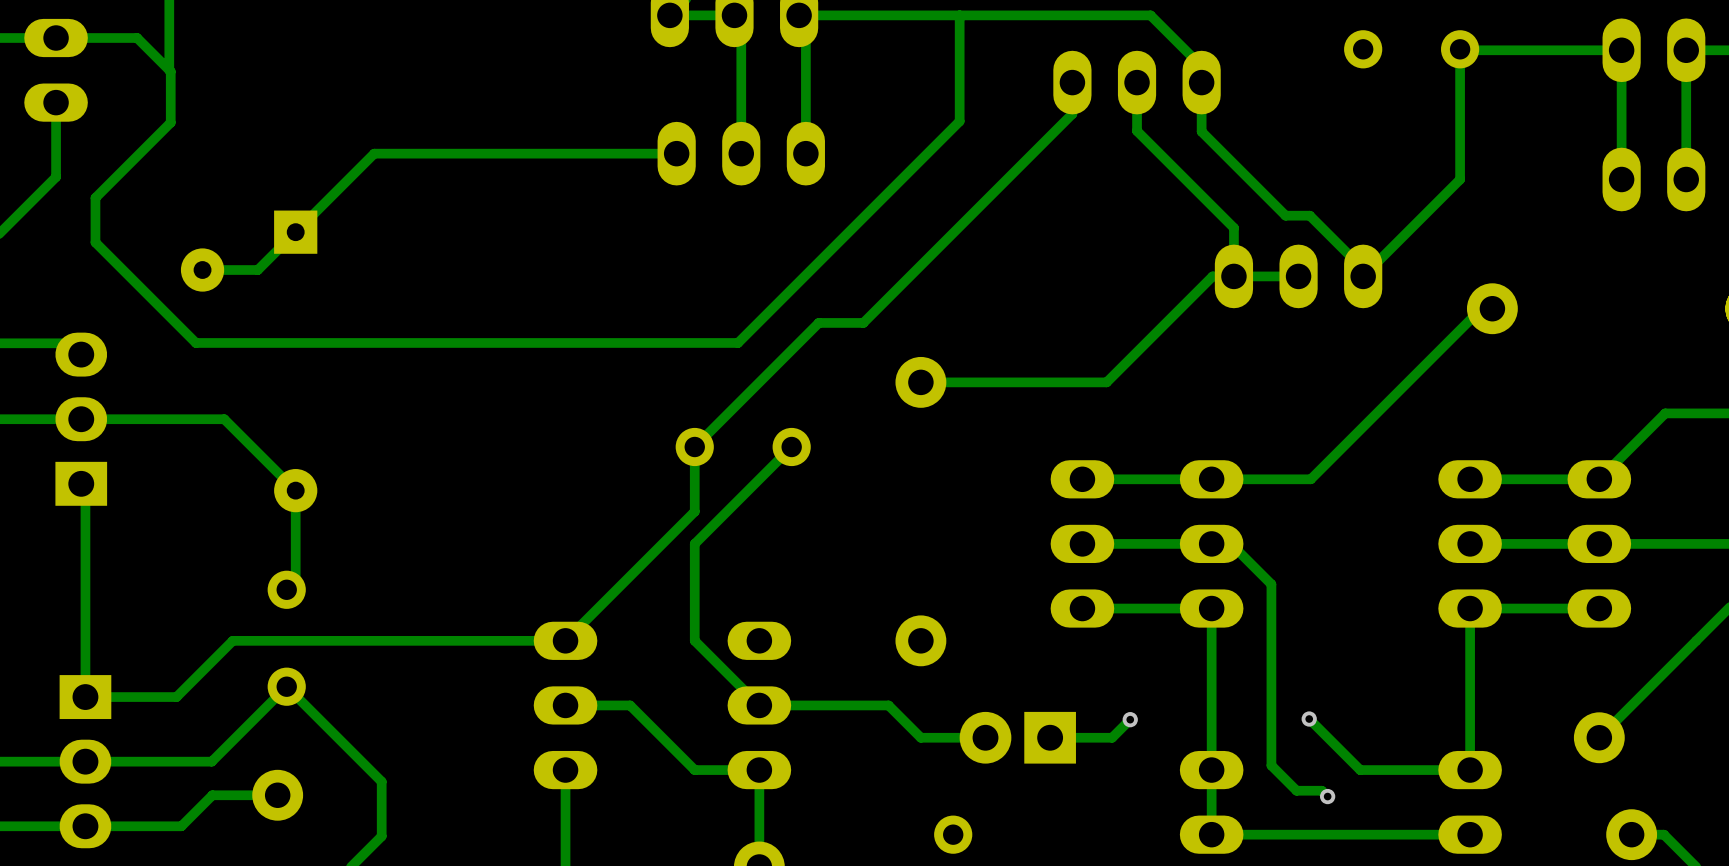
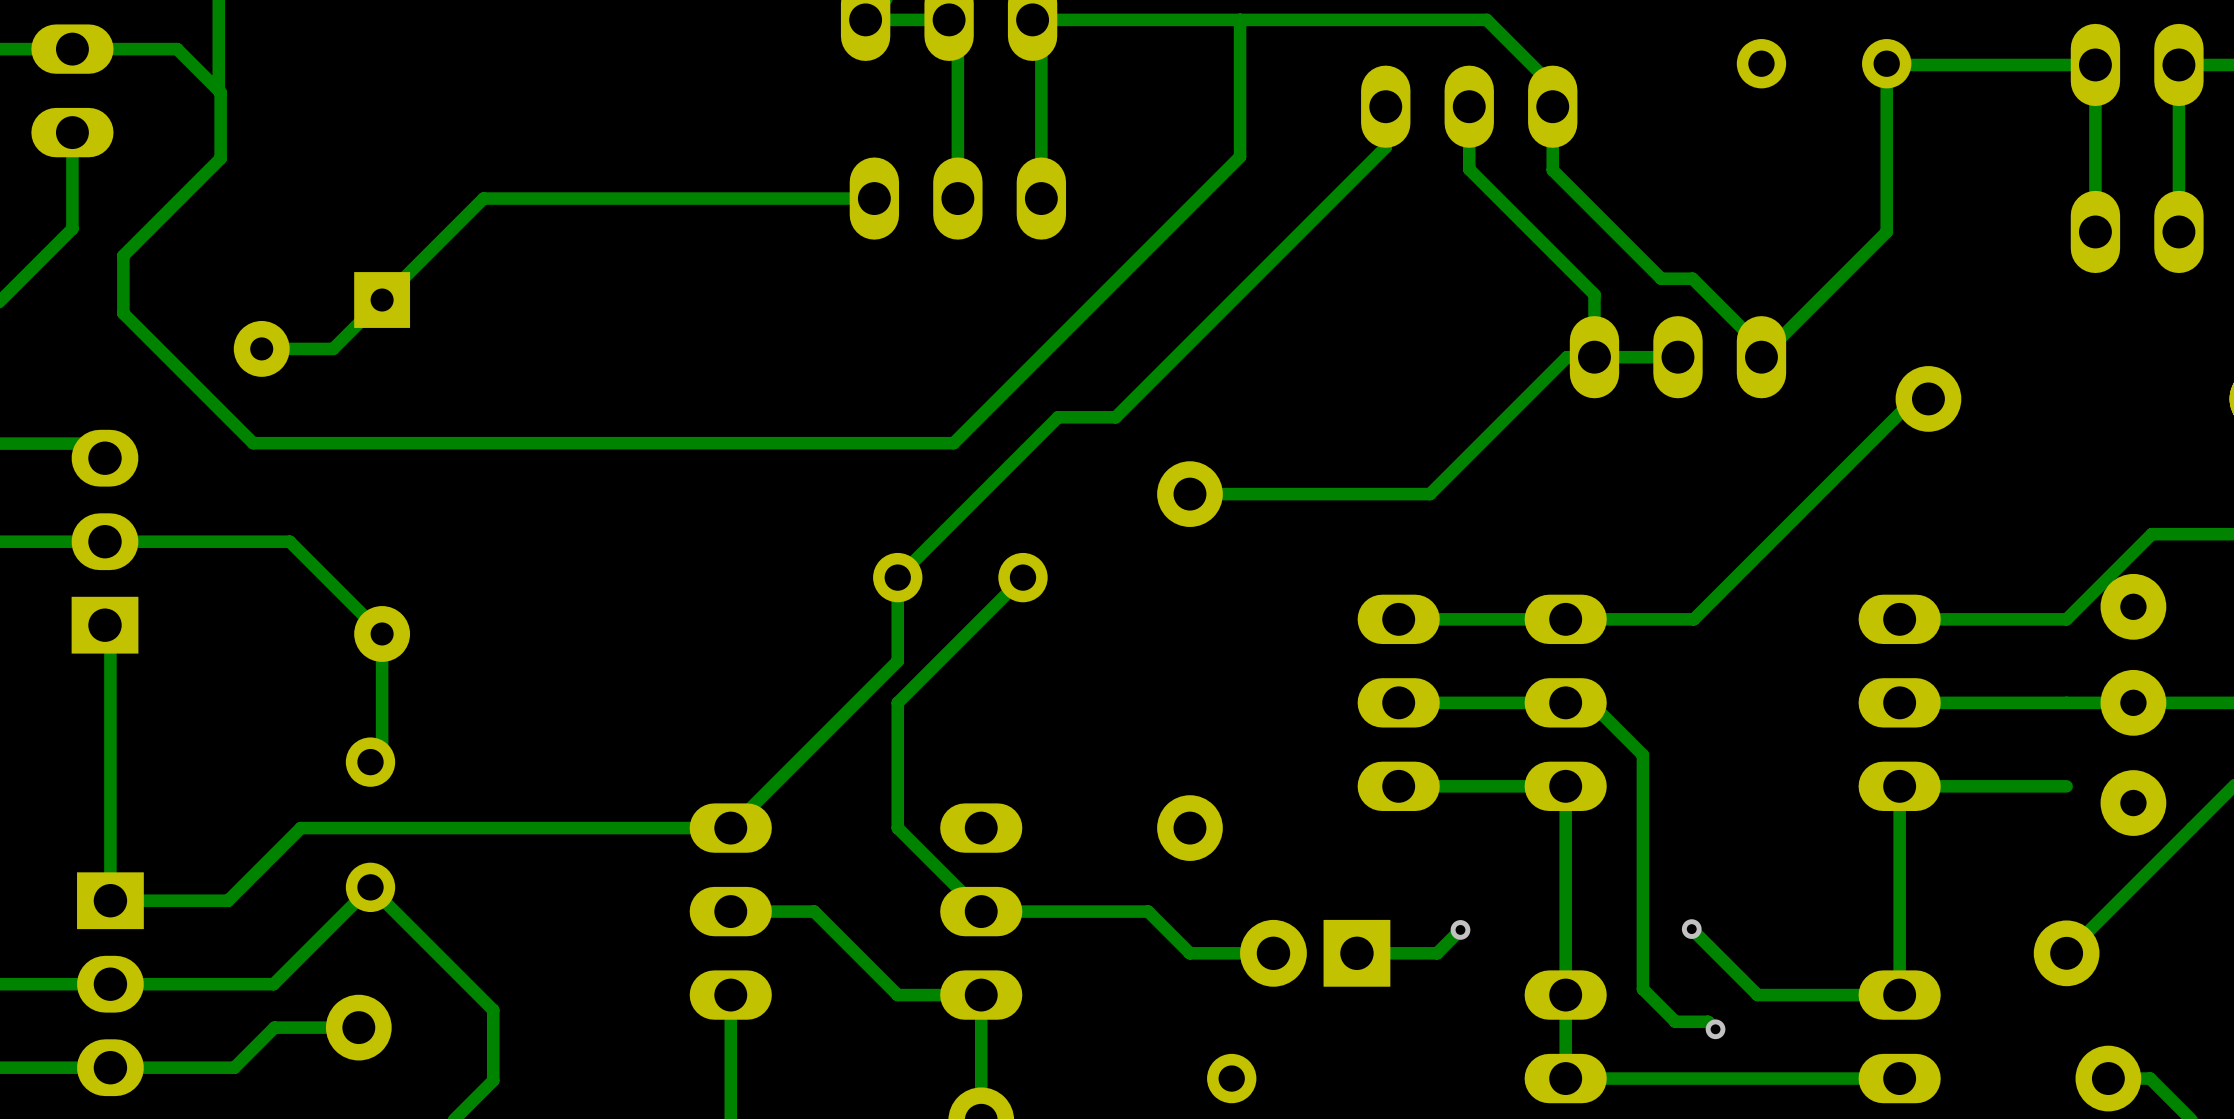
part: (1599, 543) -> none
part: none -> (2133, 704)

